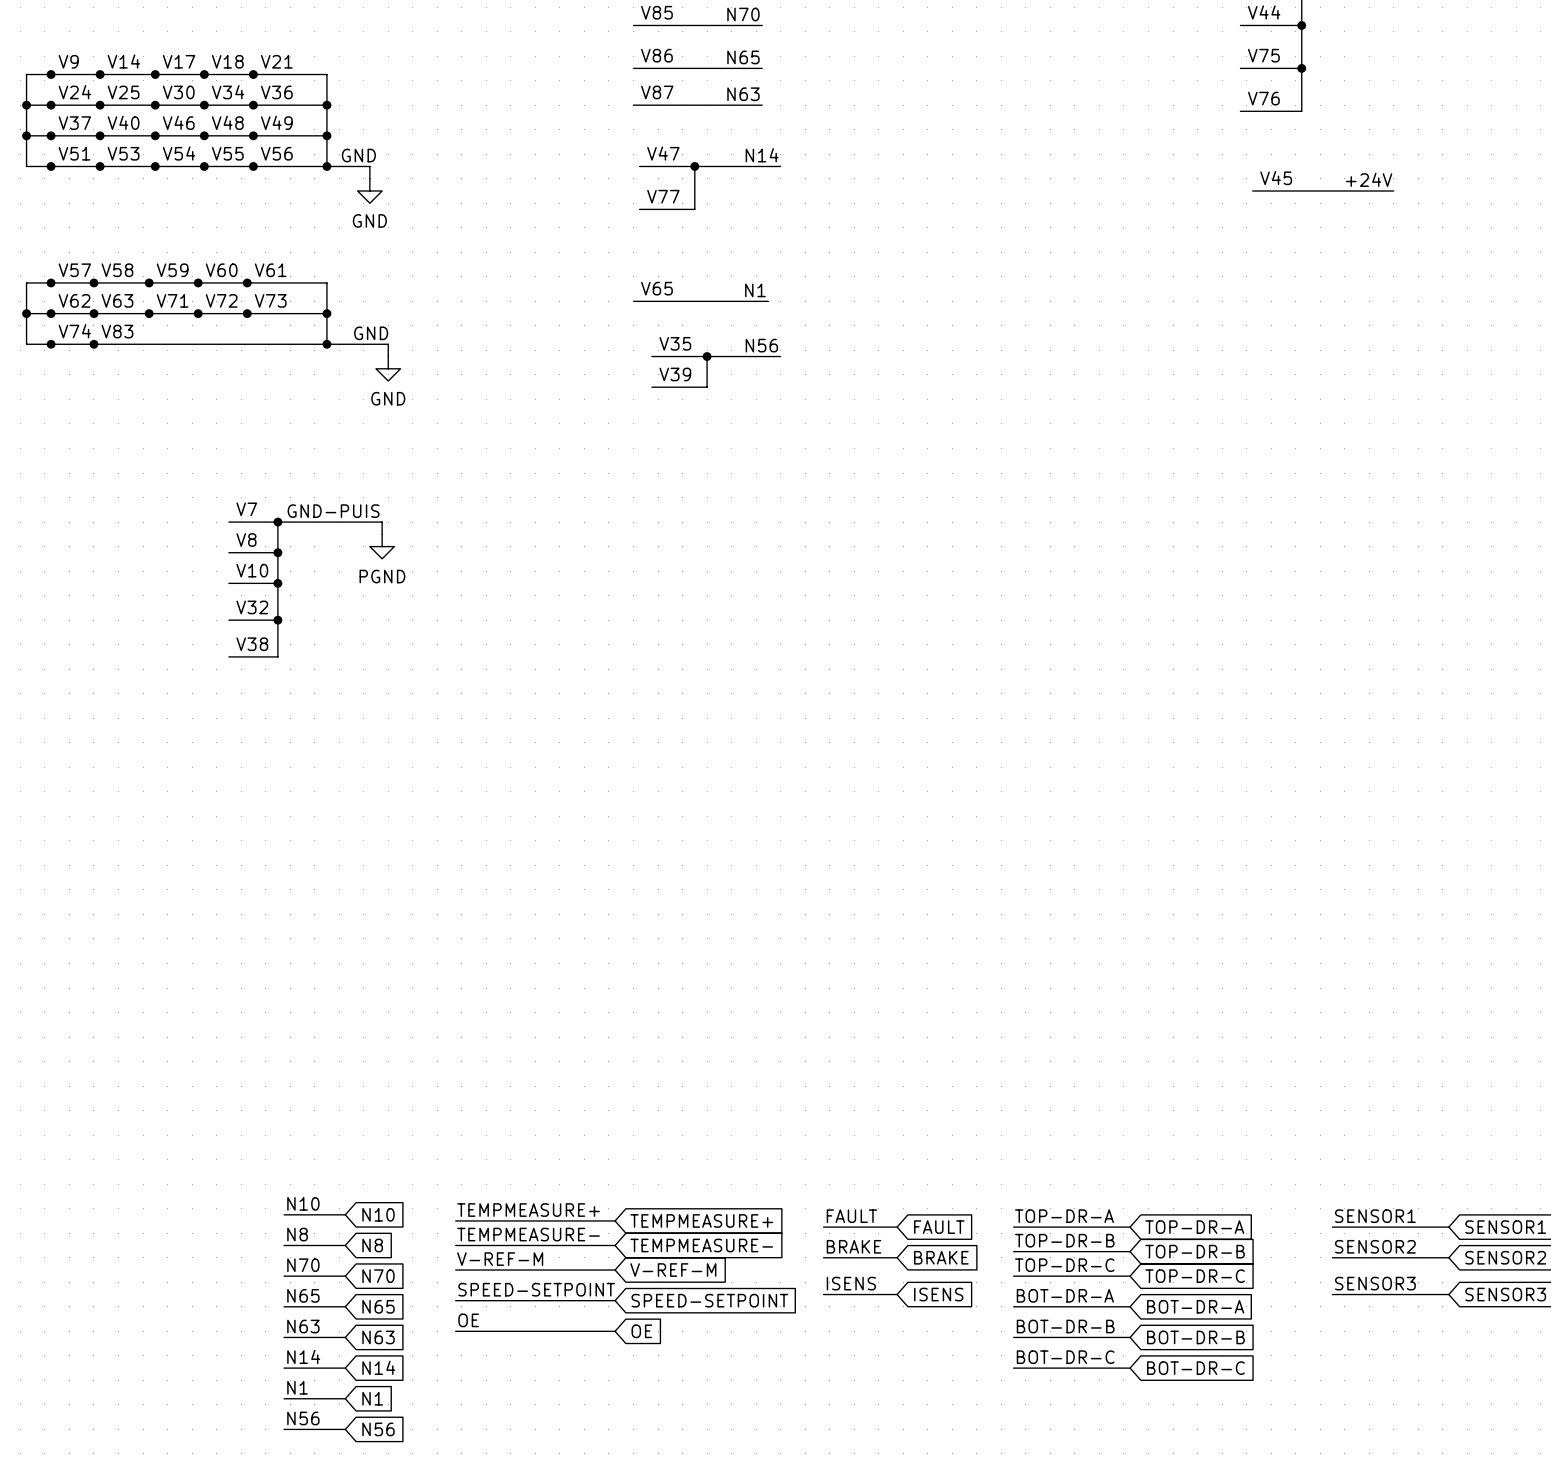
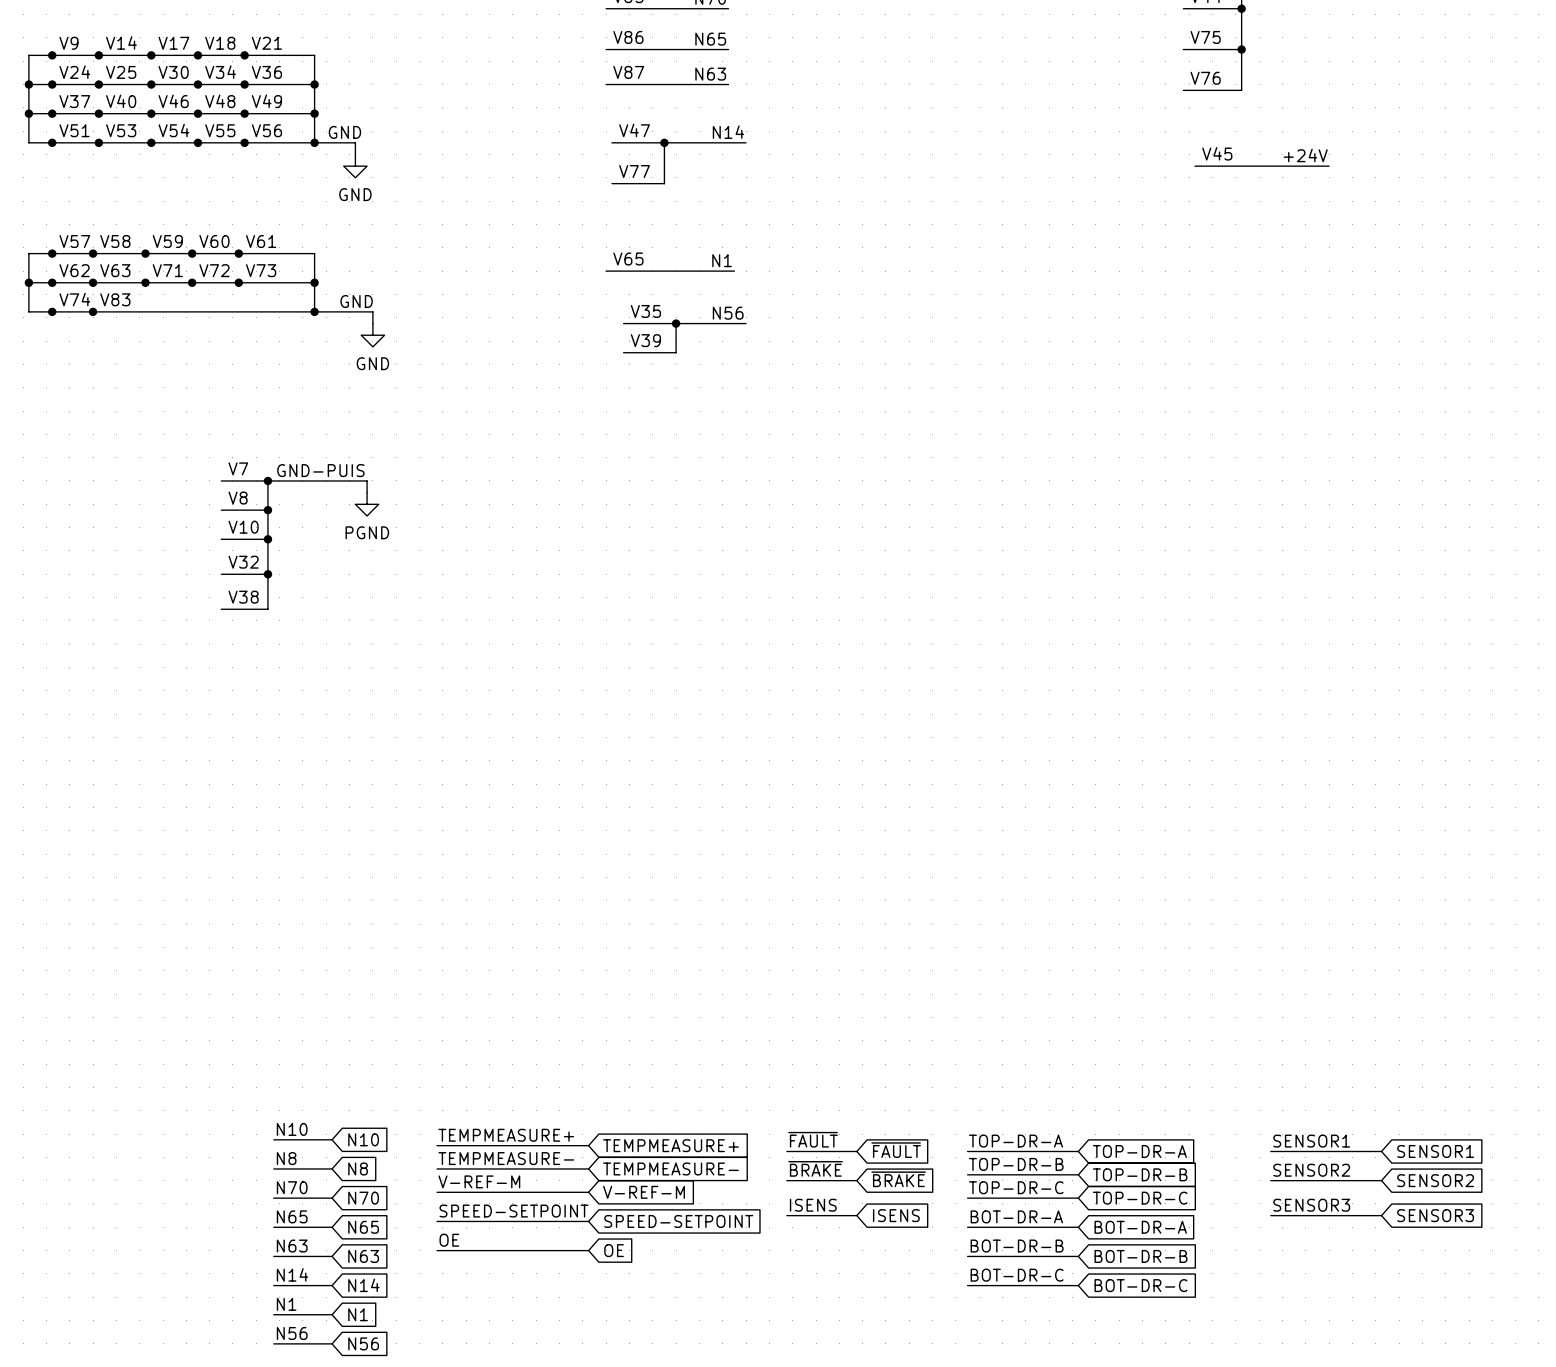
label: FAULT (851, 1216) -> ~{FAULT} (813, 1139)
global label: FAULT (939, 1227) -> ~{FAULT} (896, 1150)
label: BRAKE (854, 1246) -> ~{BRAKE} (815, 1168)
global label: BRAKE (941, 1257) -> ~{BRAKE} (898, 1179)

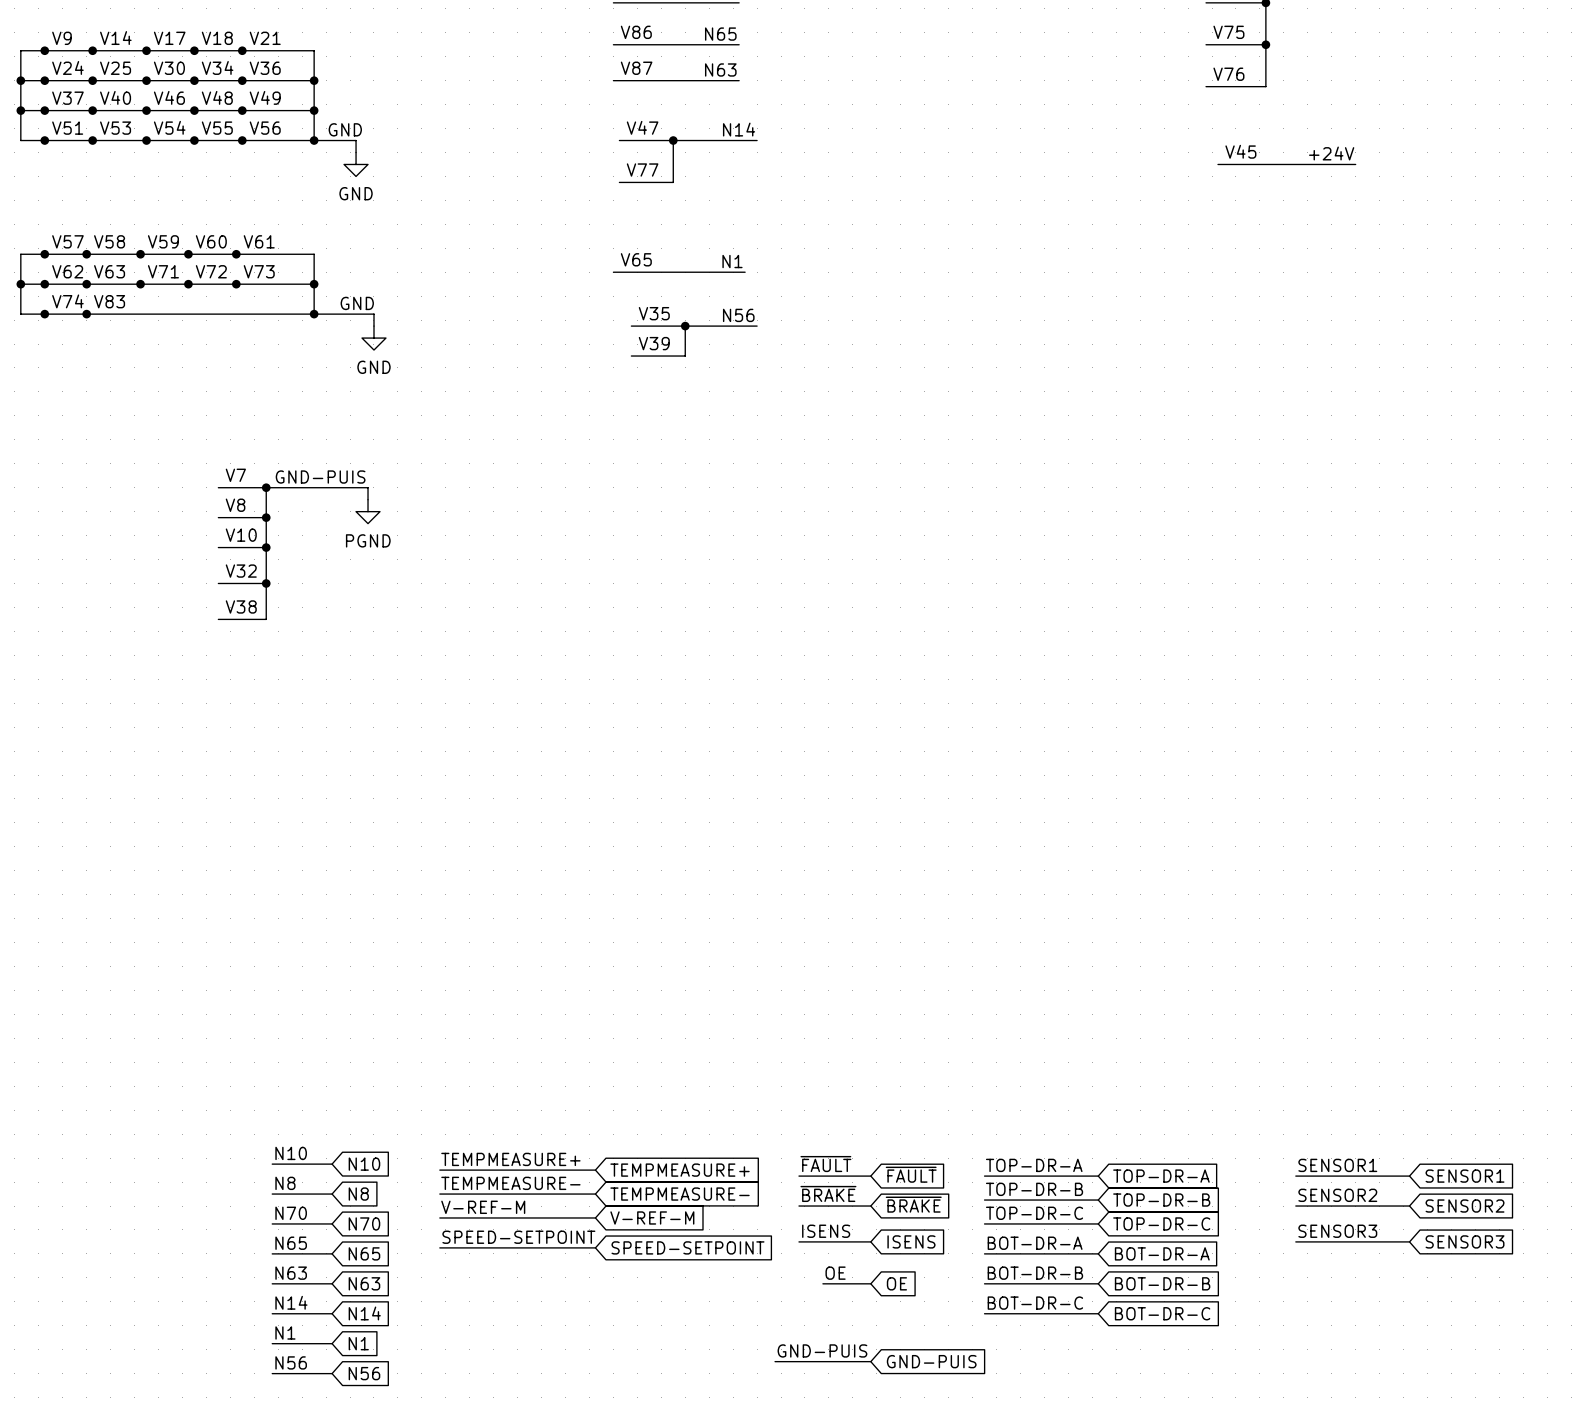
label: OE (449, 1240) -> none
label: none -> OE (835, 1273)
wire: (437, 1250) (588, 1250) -> none
global label: OE (614, 1250) -> none
wire: none -> (822, 1283) (870, 1283)
global label: none -> OE (896, 1283)
label: none -> GND-PUIS (822, 1350)
wire: none -> (775, 1361) (870, 1361)
global label: none -> GND-PUIS (931, 1361)

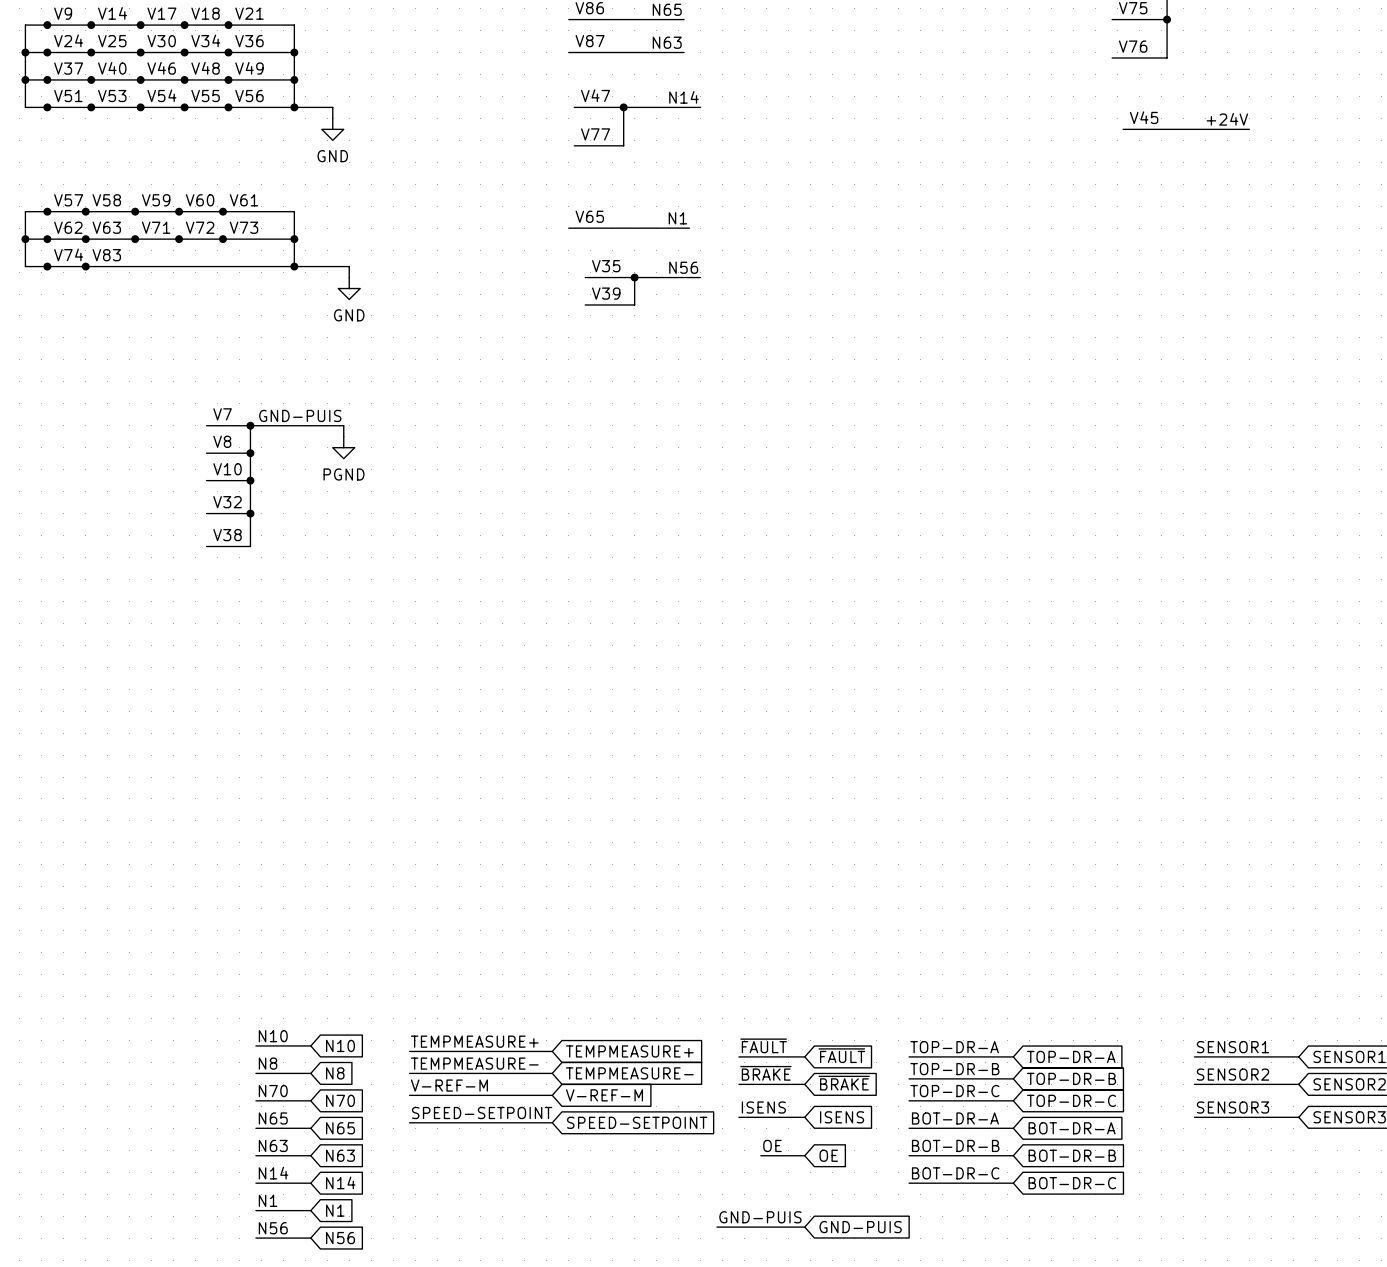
label: GND (345, 129) -> none
label: GND (357, 303) -> none

